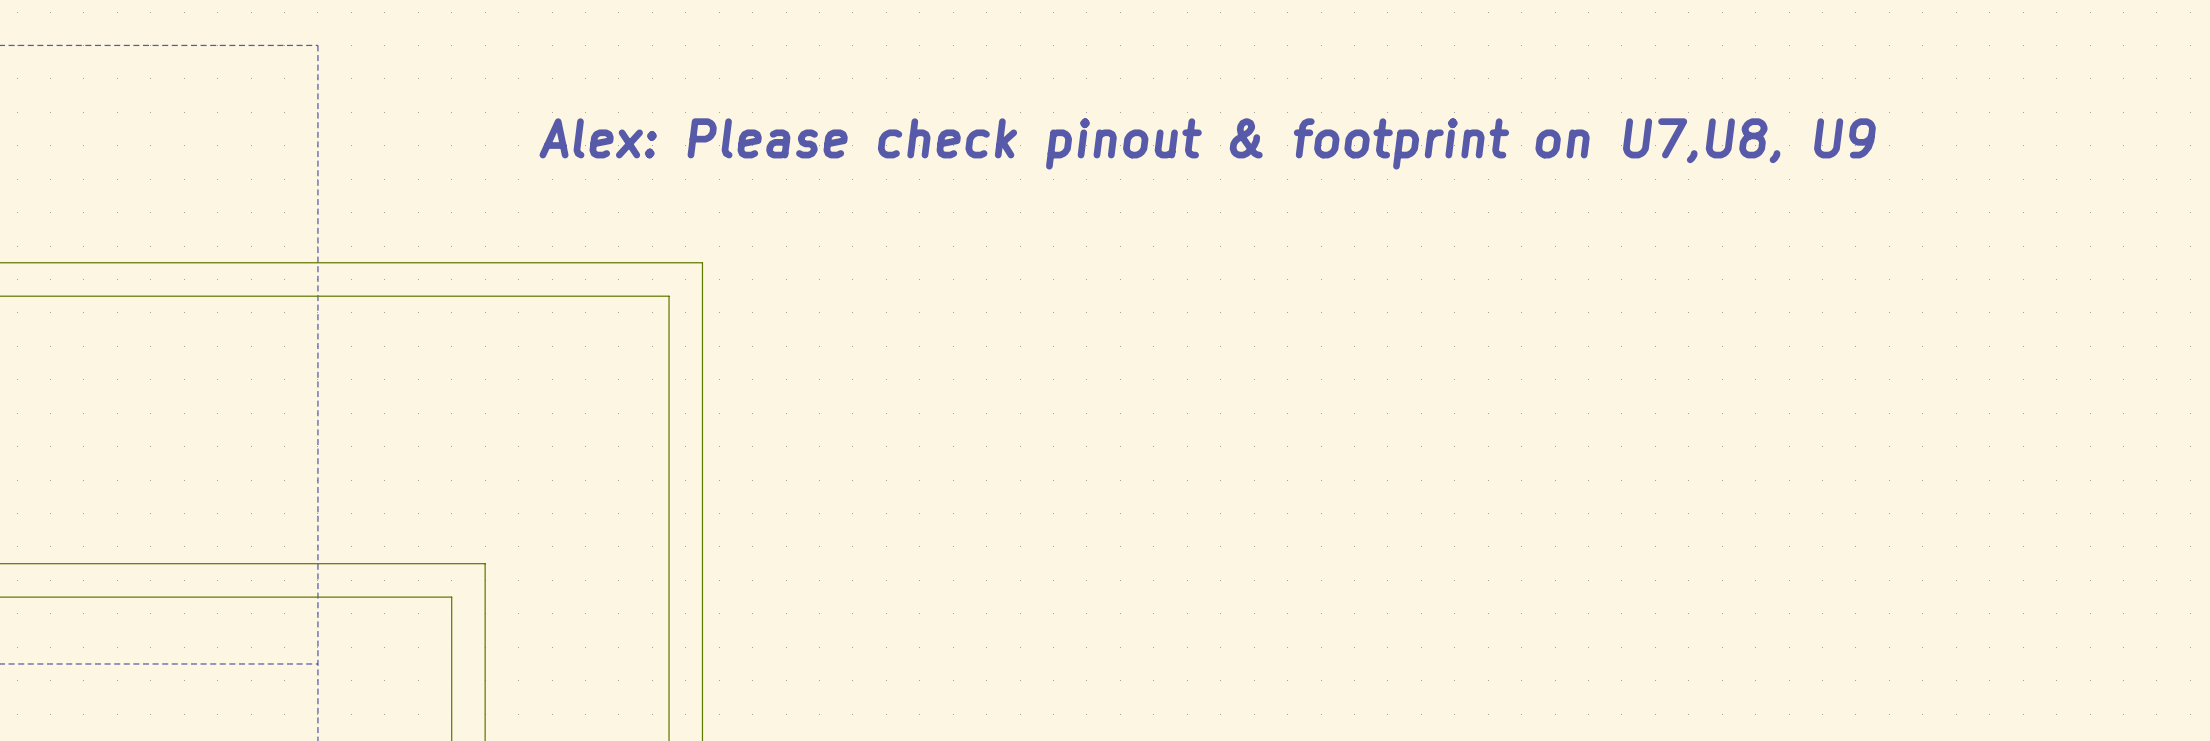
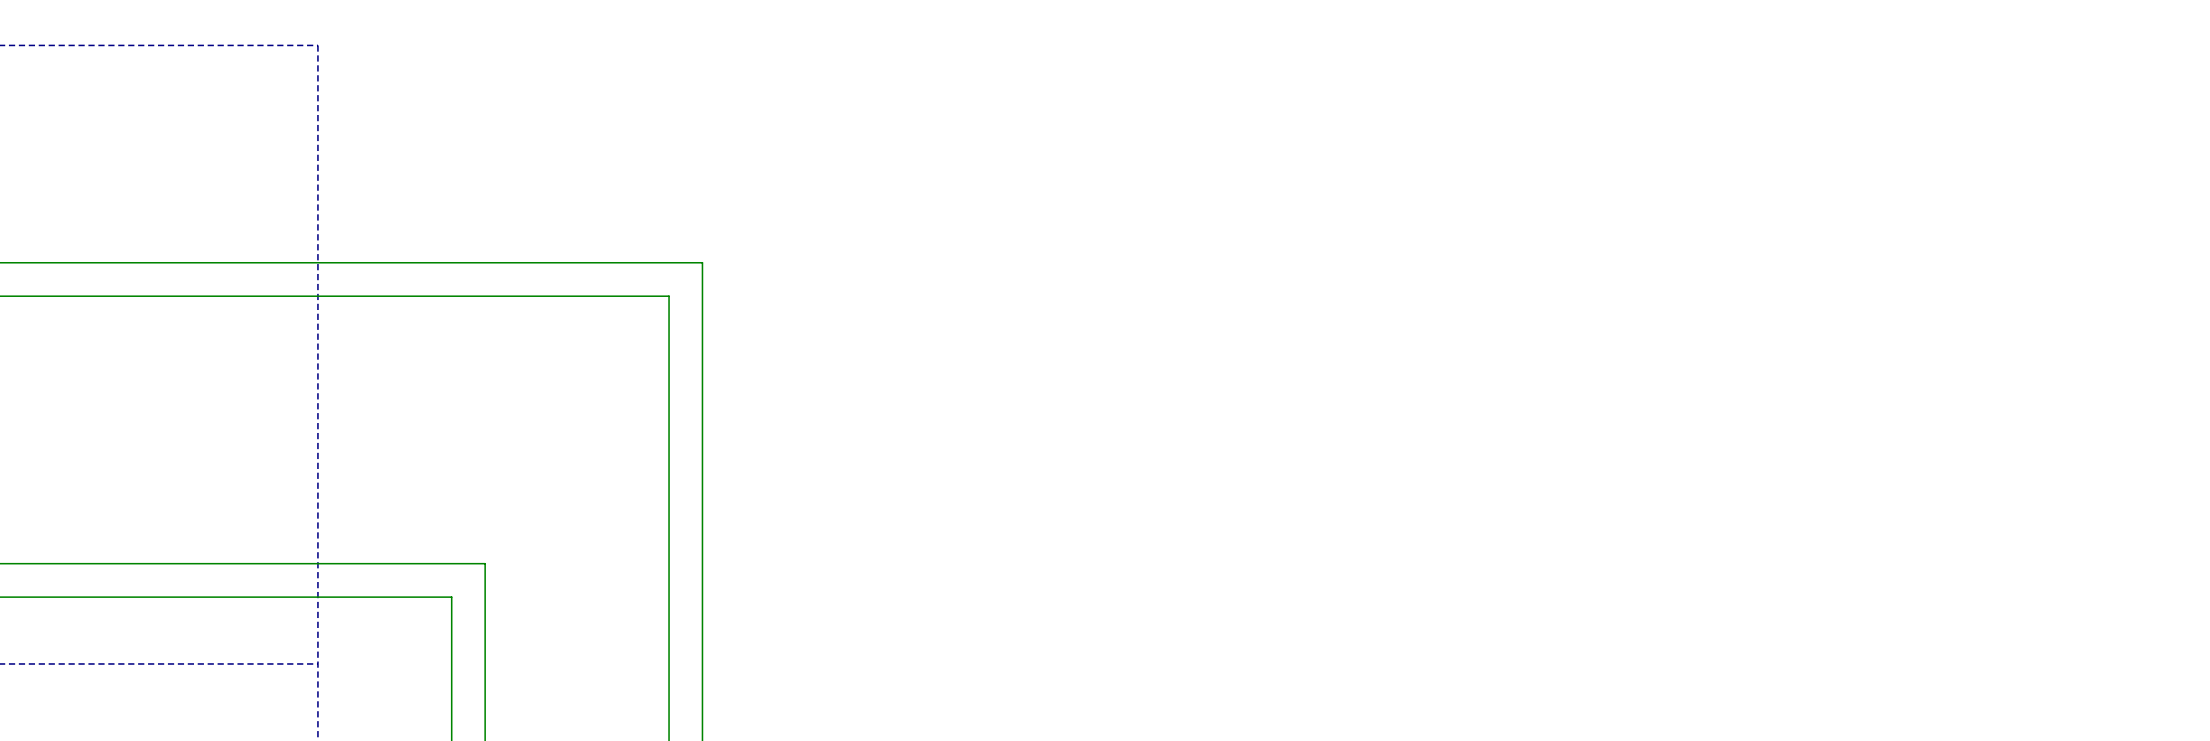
text: Alex: Please check pinout & footprint on U7,U8, U9 (1207, 143) -> none

